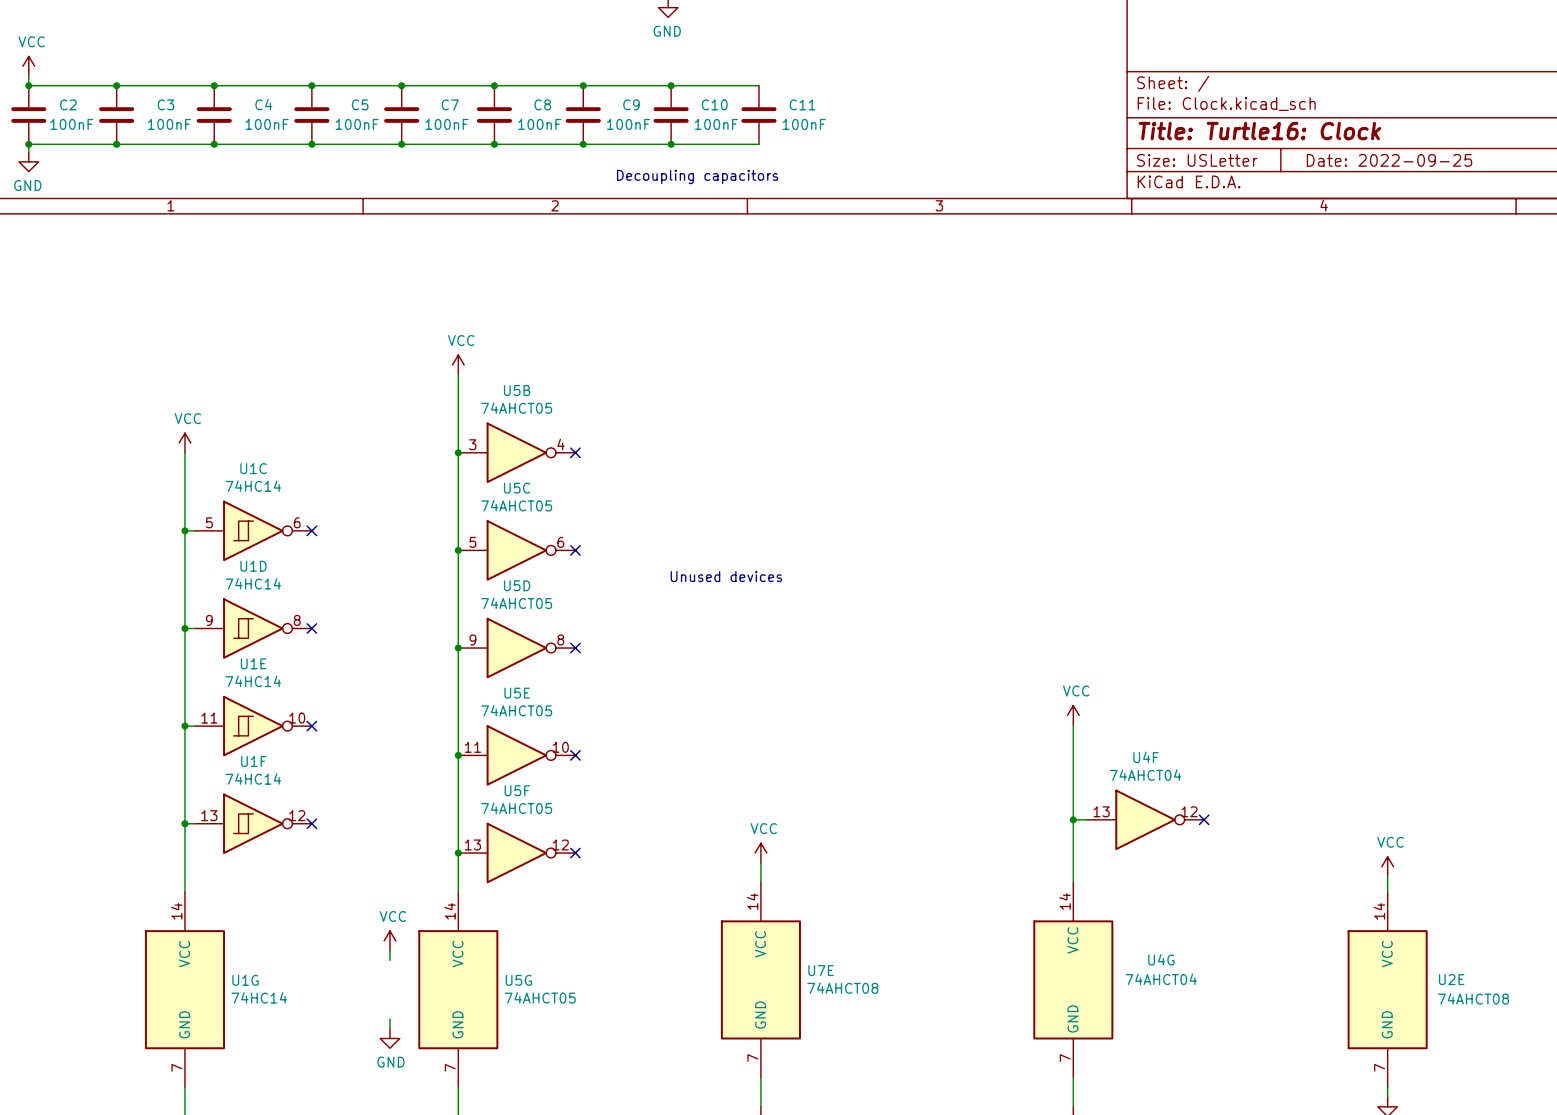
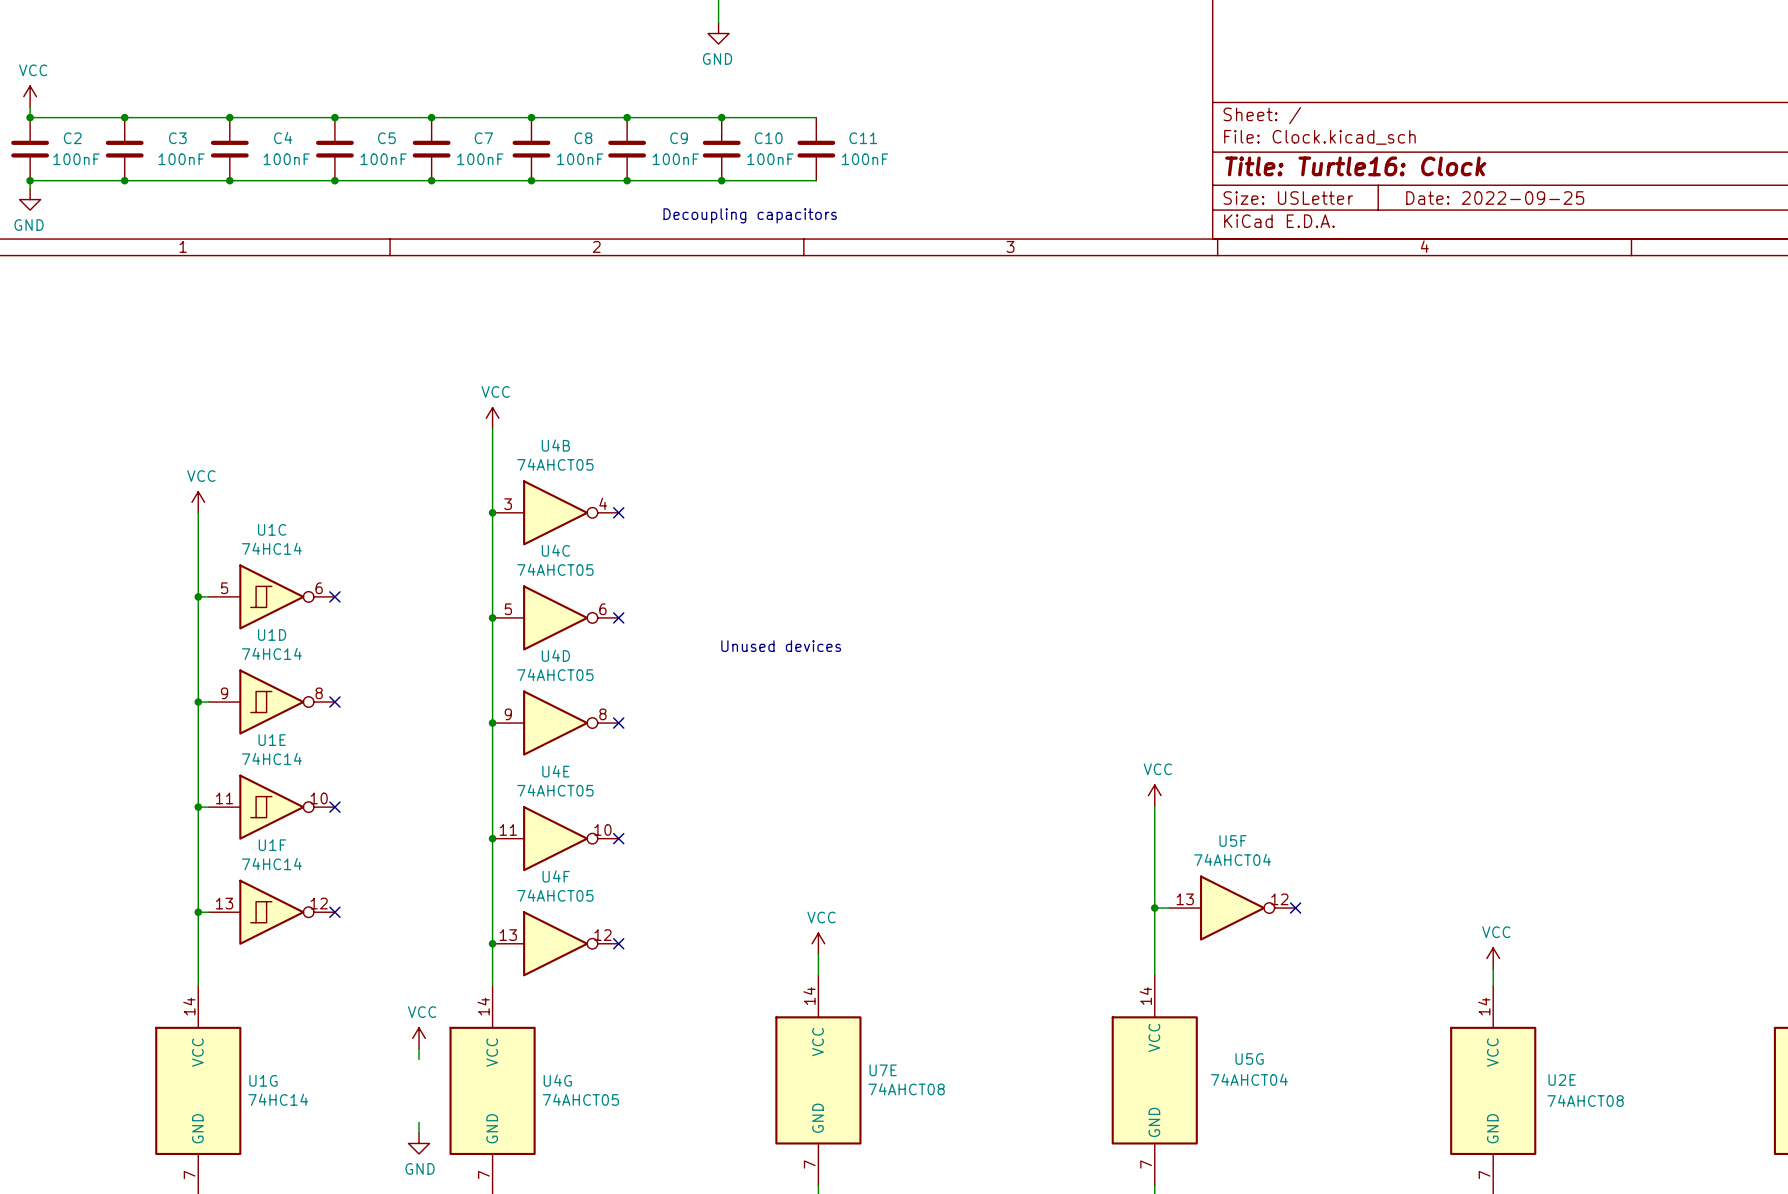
U5B name: U5B (517, 390) -> U4B (555, 445)
U5C name: U5C (517, 488) -> U4C (555, 550)
U5D name: U5D (517, 585) -> U4D (555, 655)
U5E name: U5E (517, 693) -> U4E (555, 771)
U4F name: U4F (1146, 757) -> U5F (1233, 841)
U5F name: U5F (517, 790) -> U4F (556, 876)
U4G name: U4G (1161, 959) -> U5G (1249, 1058)
U5G name: U5G (518, 980) -> U4G (557, 1080)

